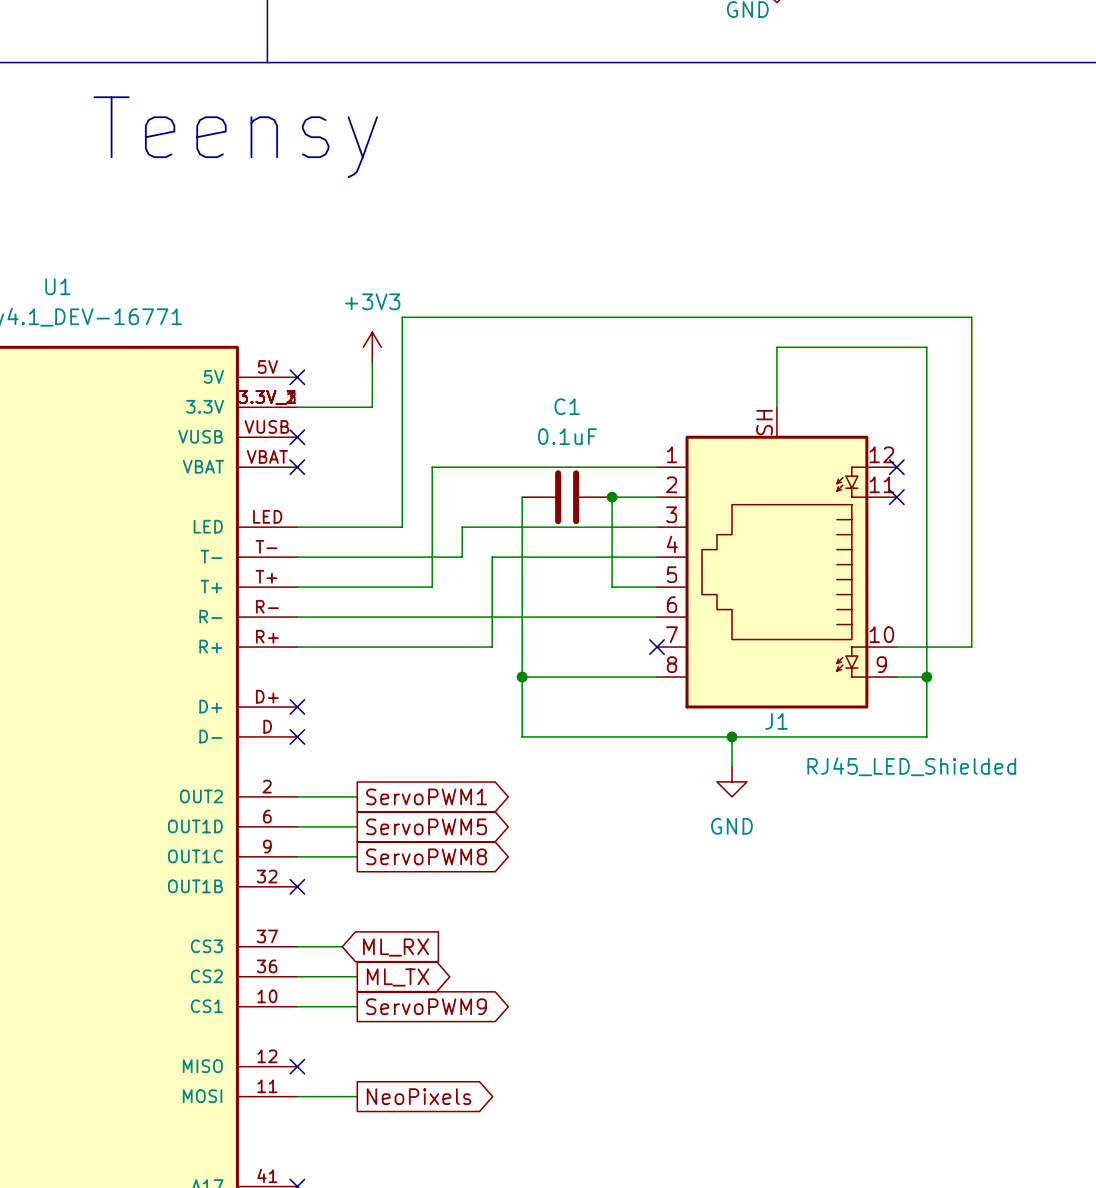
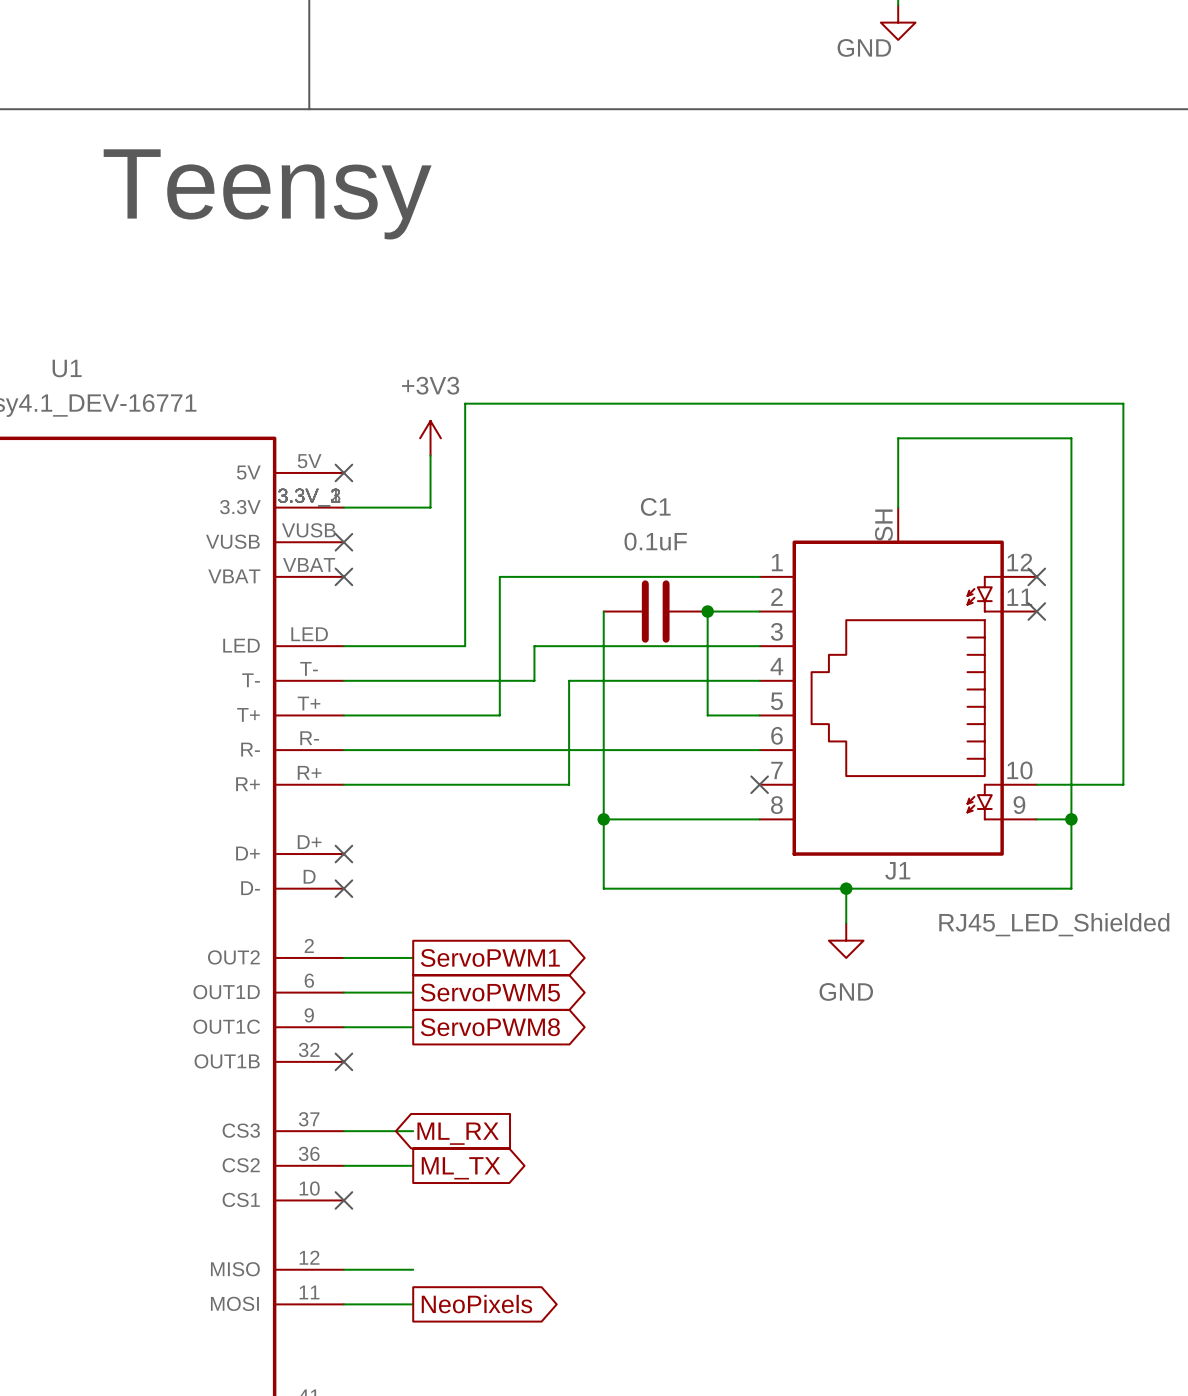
wire: none -> (395, 1131) (413, 1131)
wire: (297, 1006) (357, 1006) -> (343, 1269) (413, 1269)
global label: ServoPWM9 (426, 1006) -> none
no-connect mark position: (297, 1066) -> (343, 1200)

